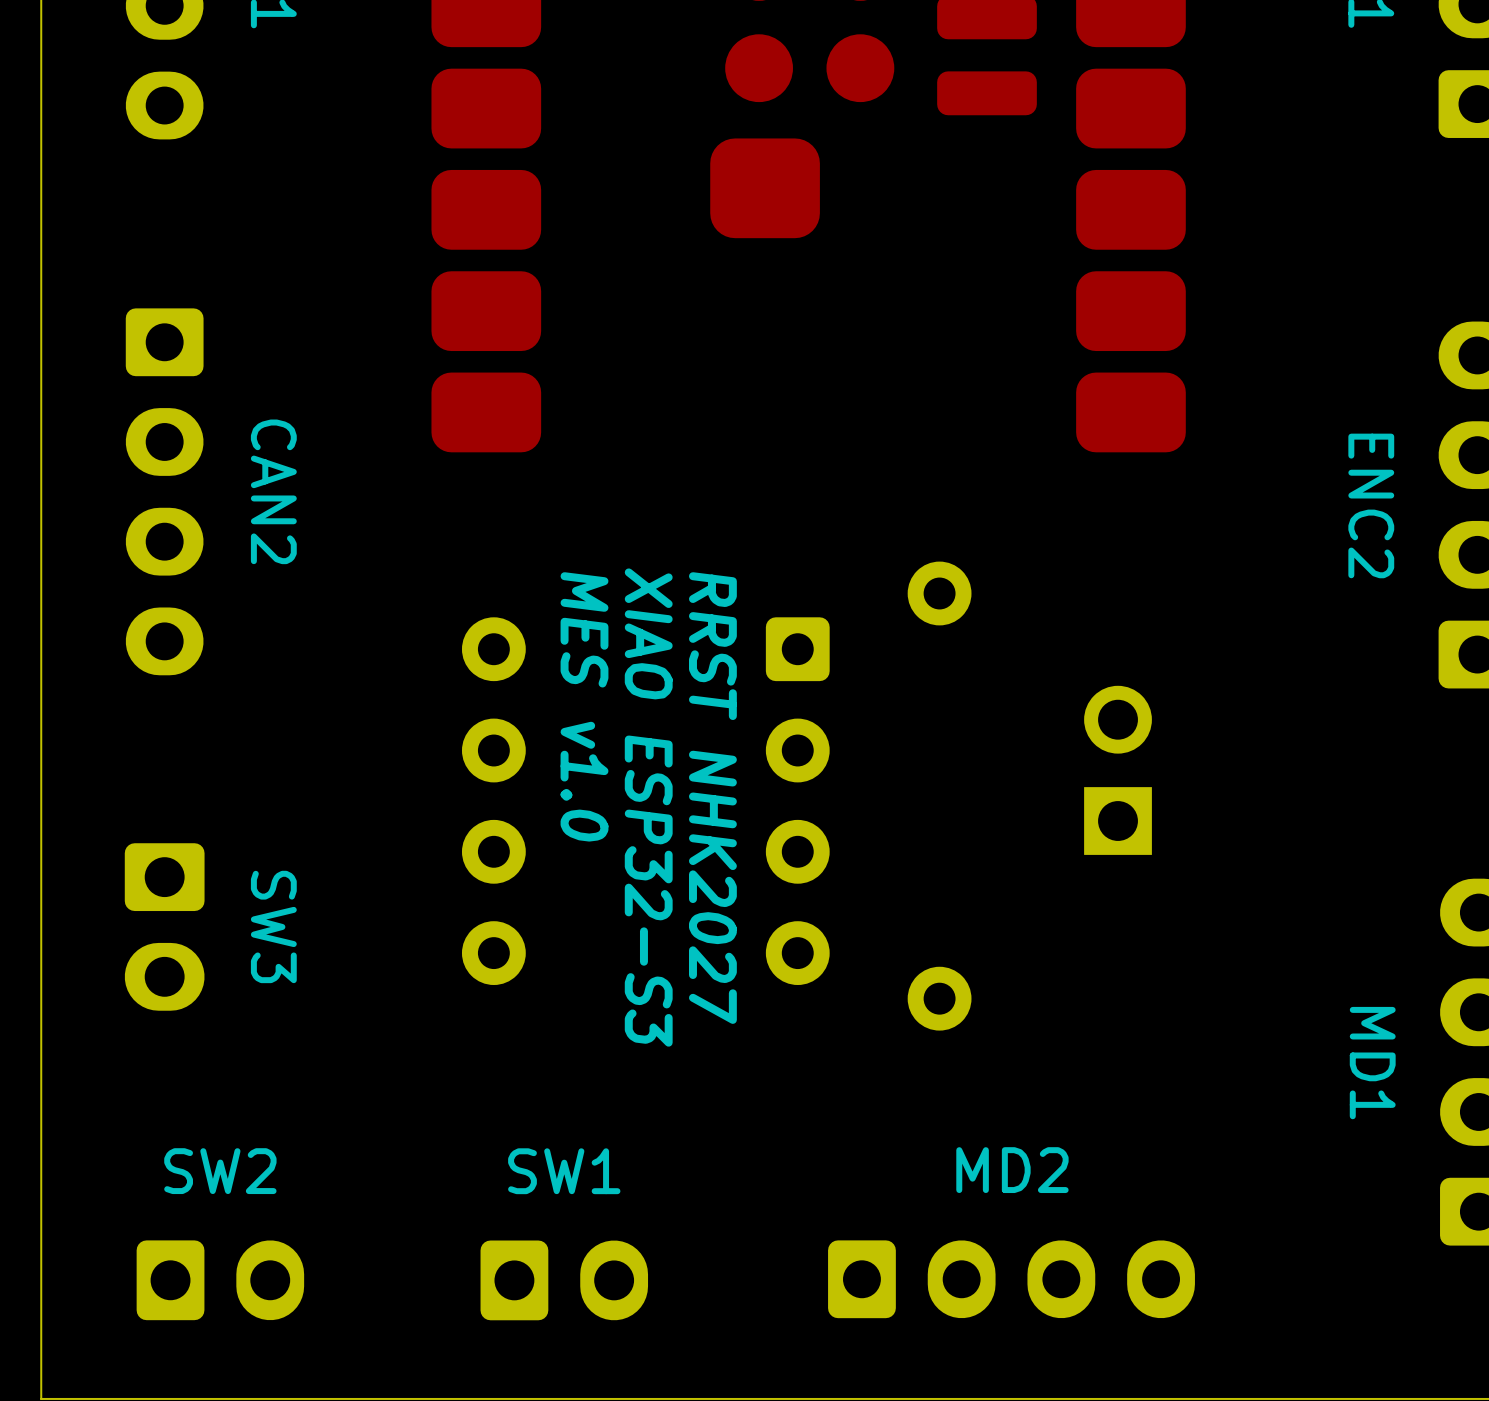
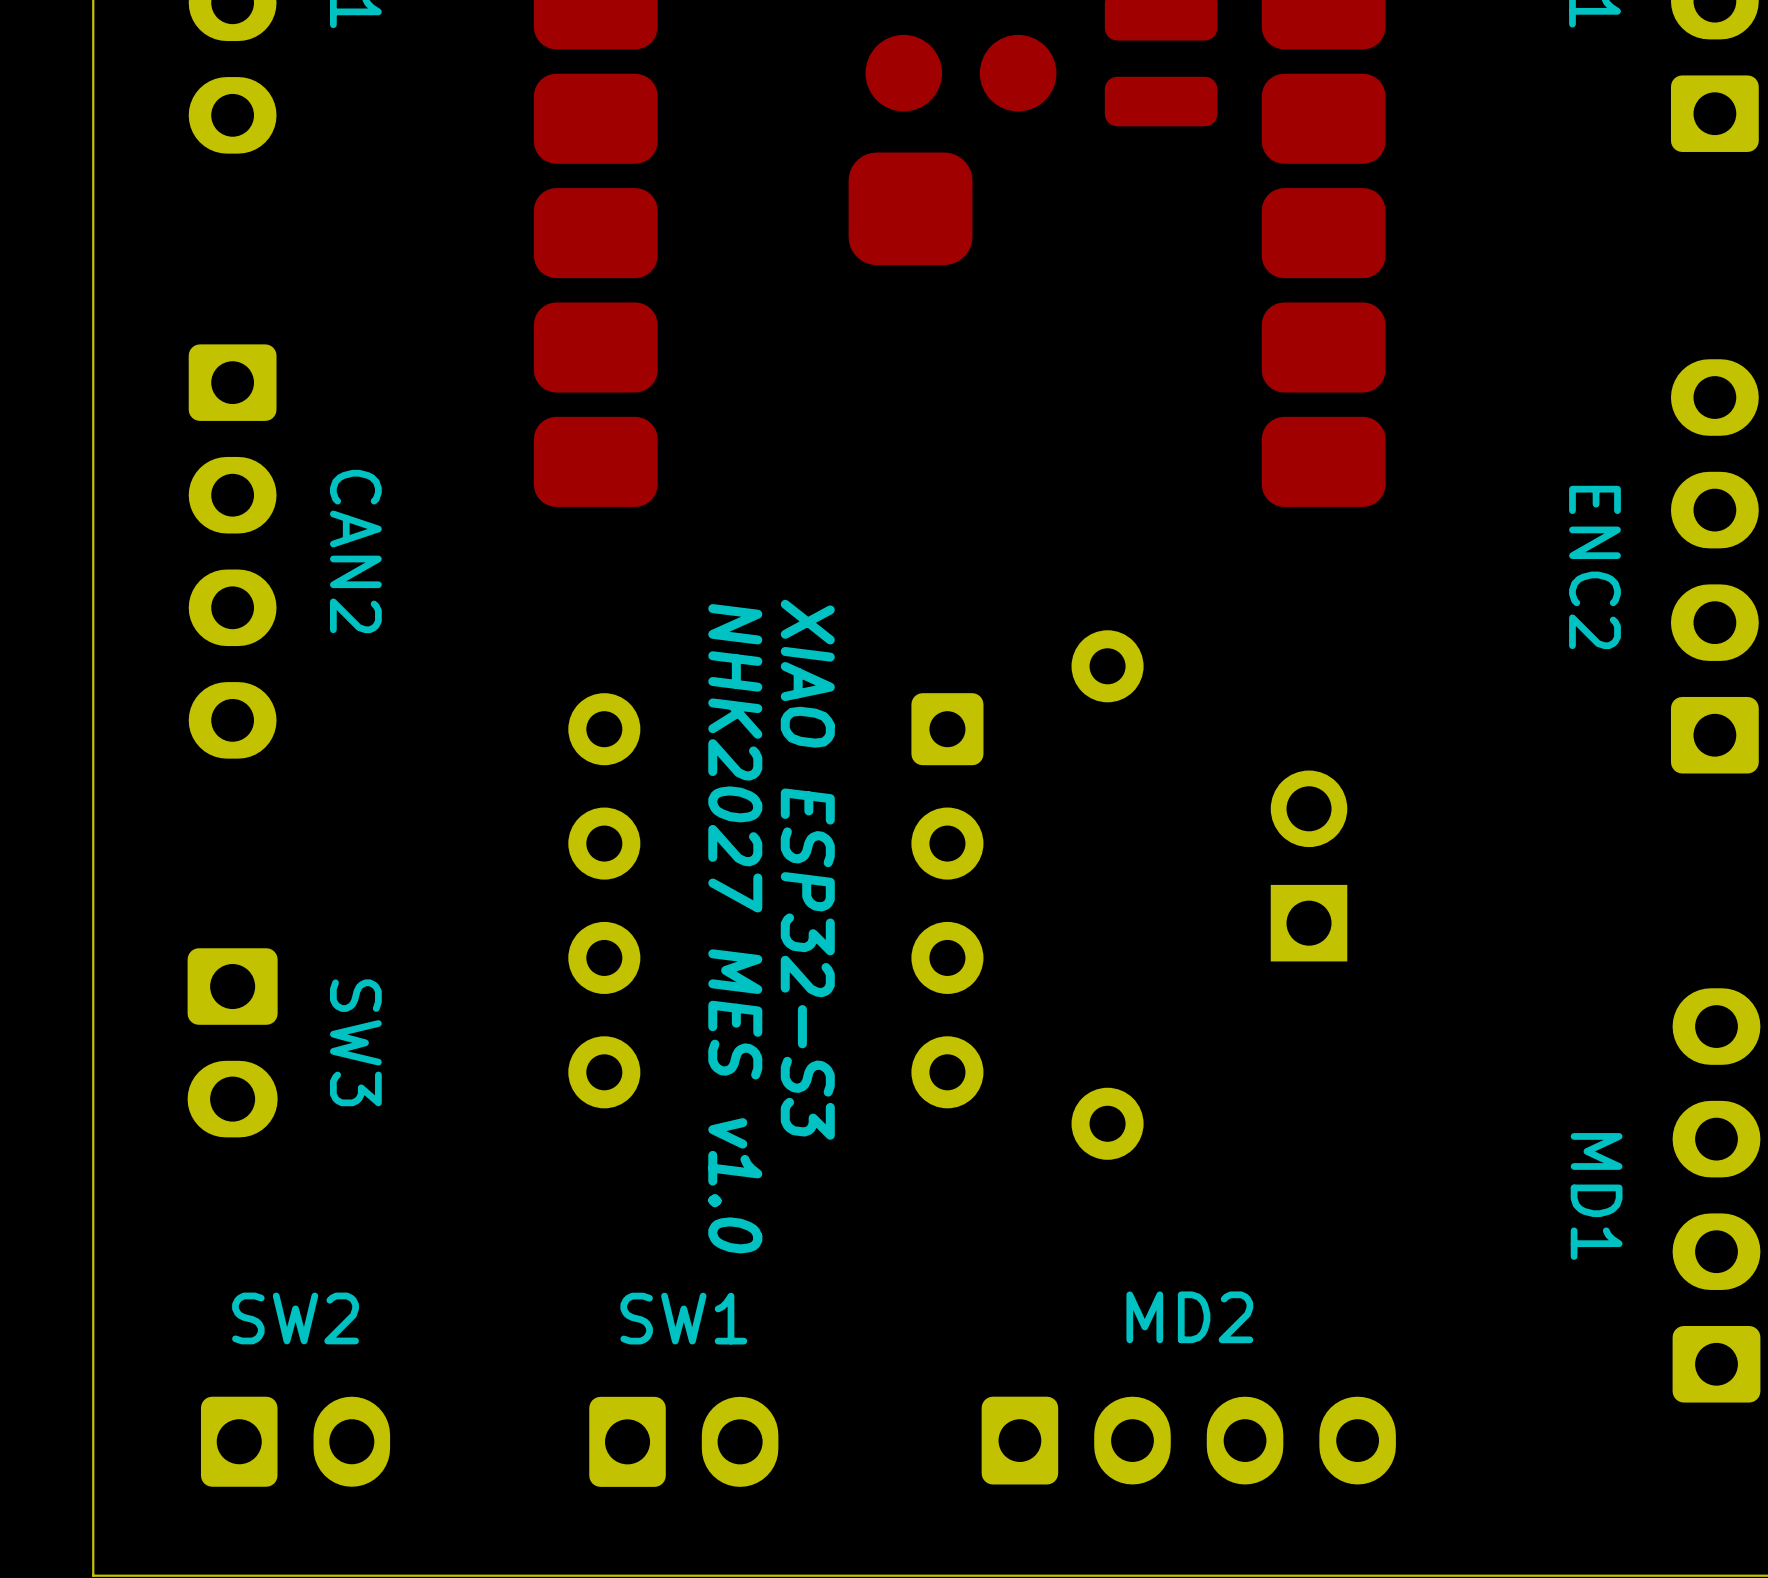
text: MES v1.0 (584, 706) -> NHK2027 MES v1.0 (735, 928)
text: RRST NHK2027 (712, 798) -> none
text position: XIAO ESP32-S3 (648, 807) -> XIAO ESP32-S3 (807, 869)

